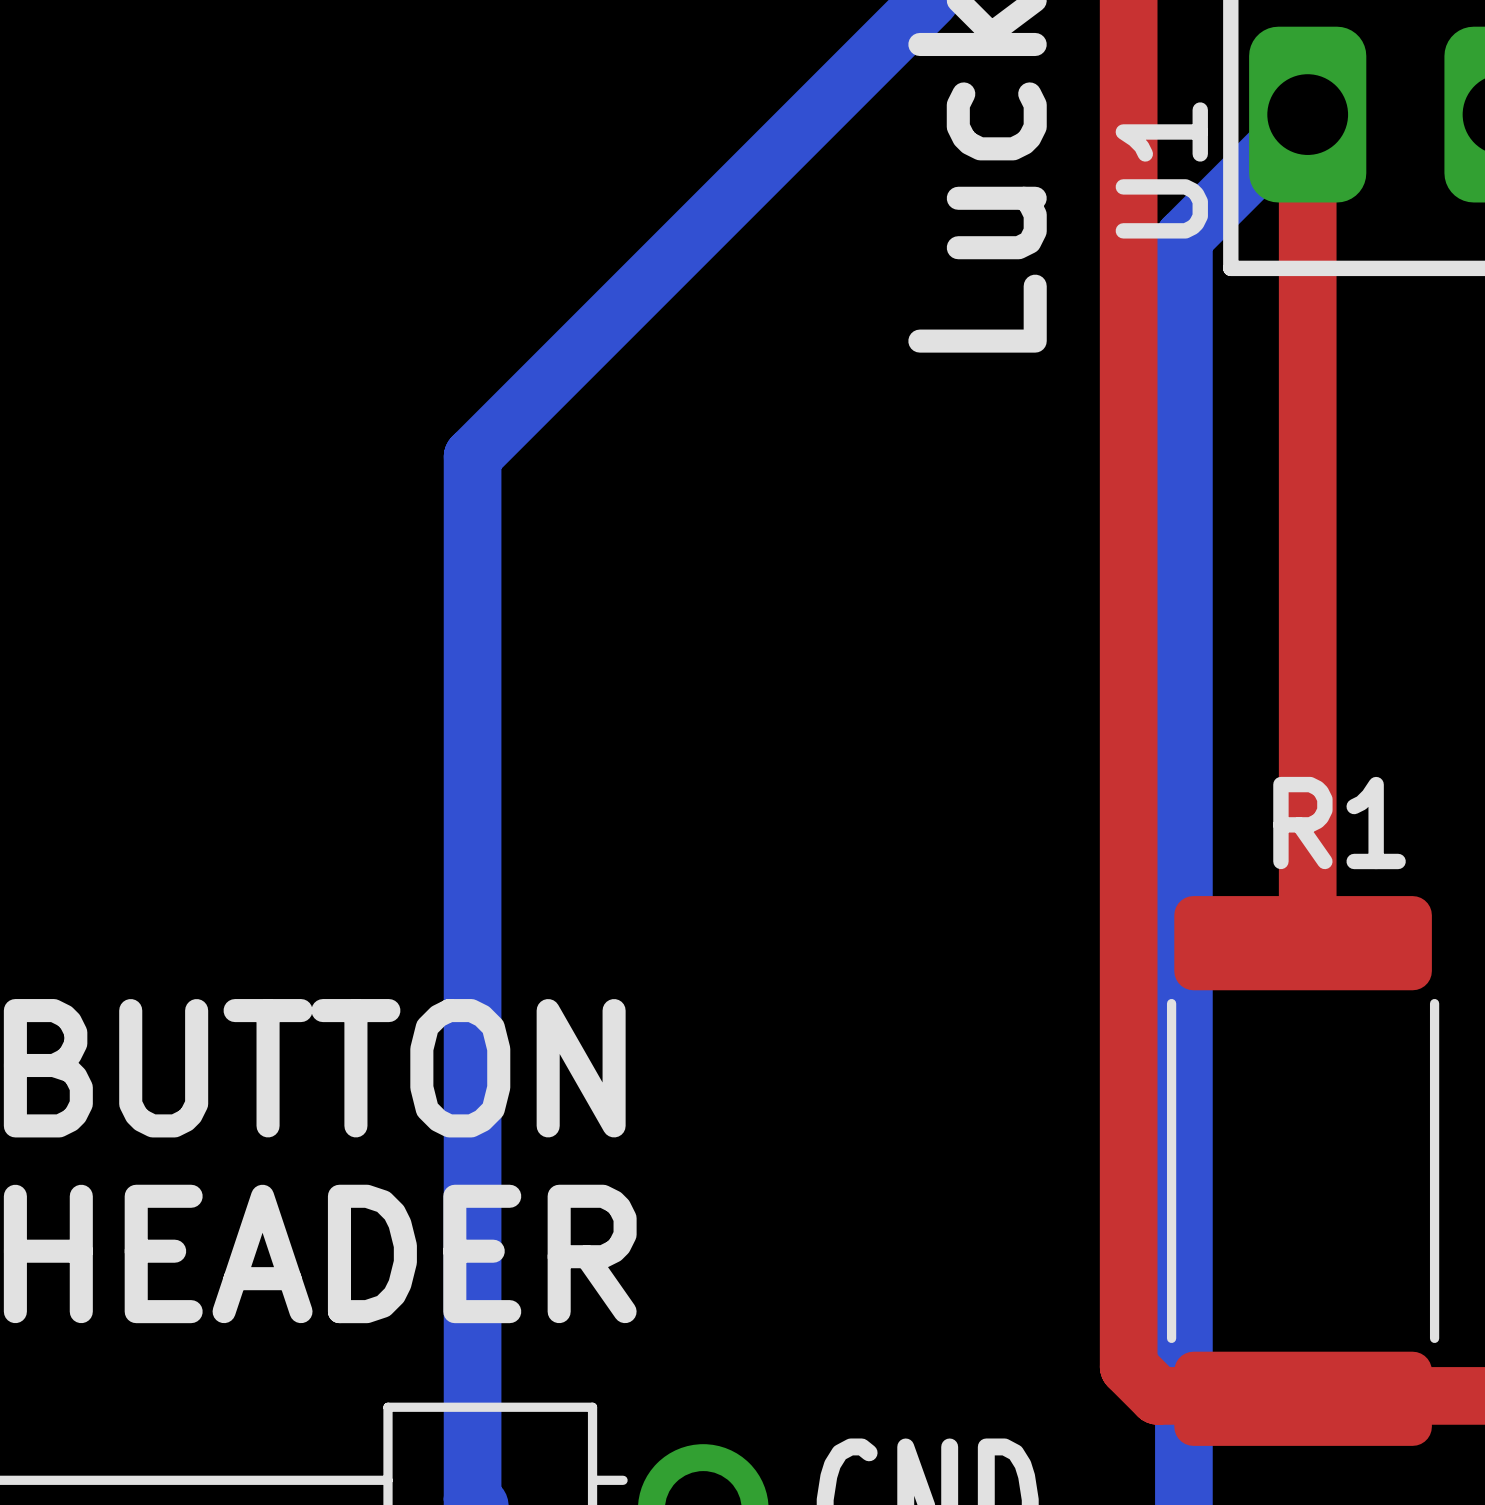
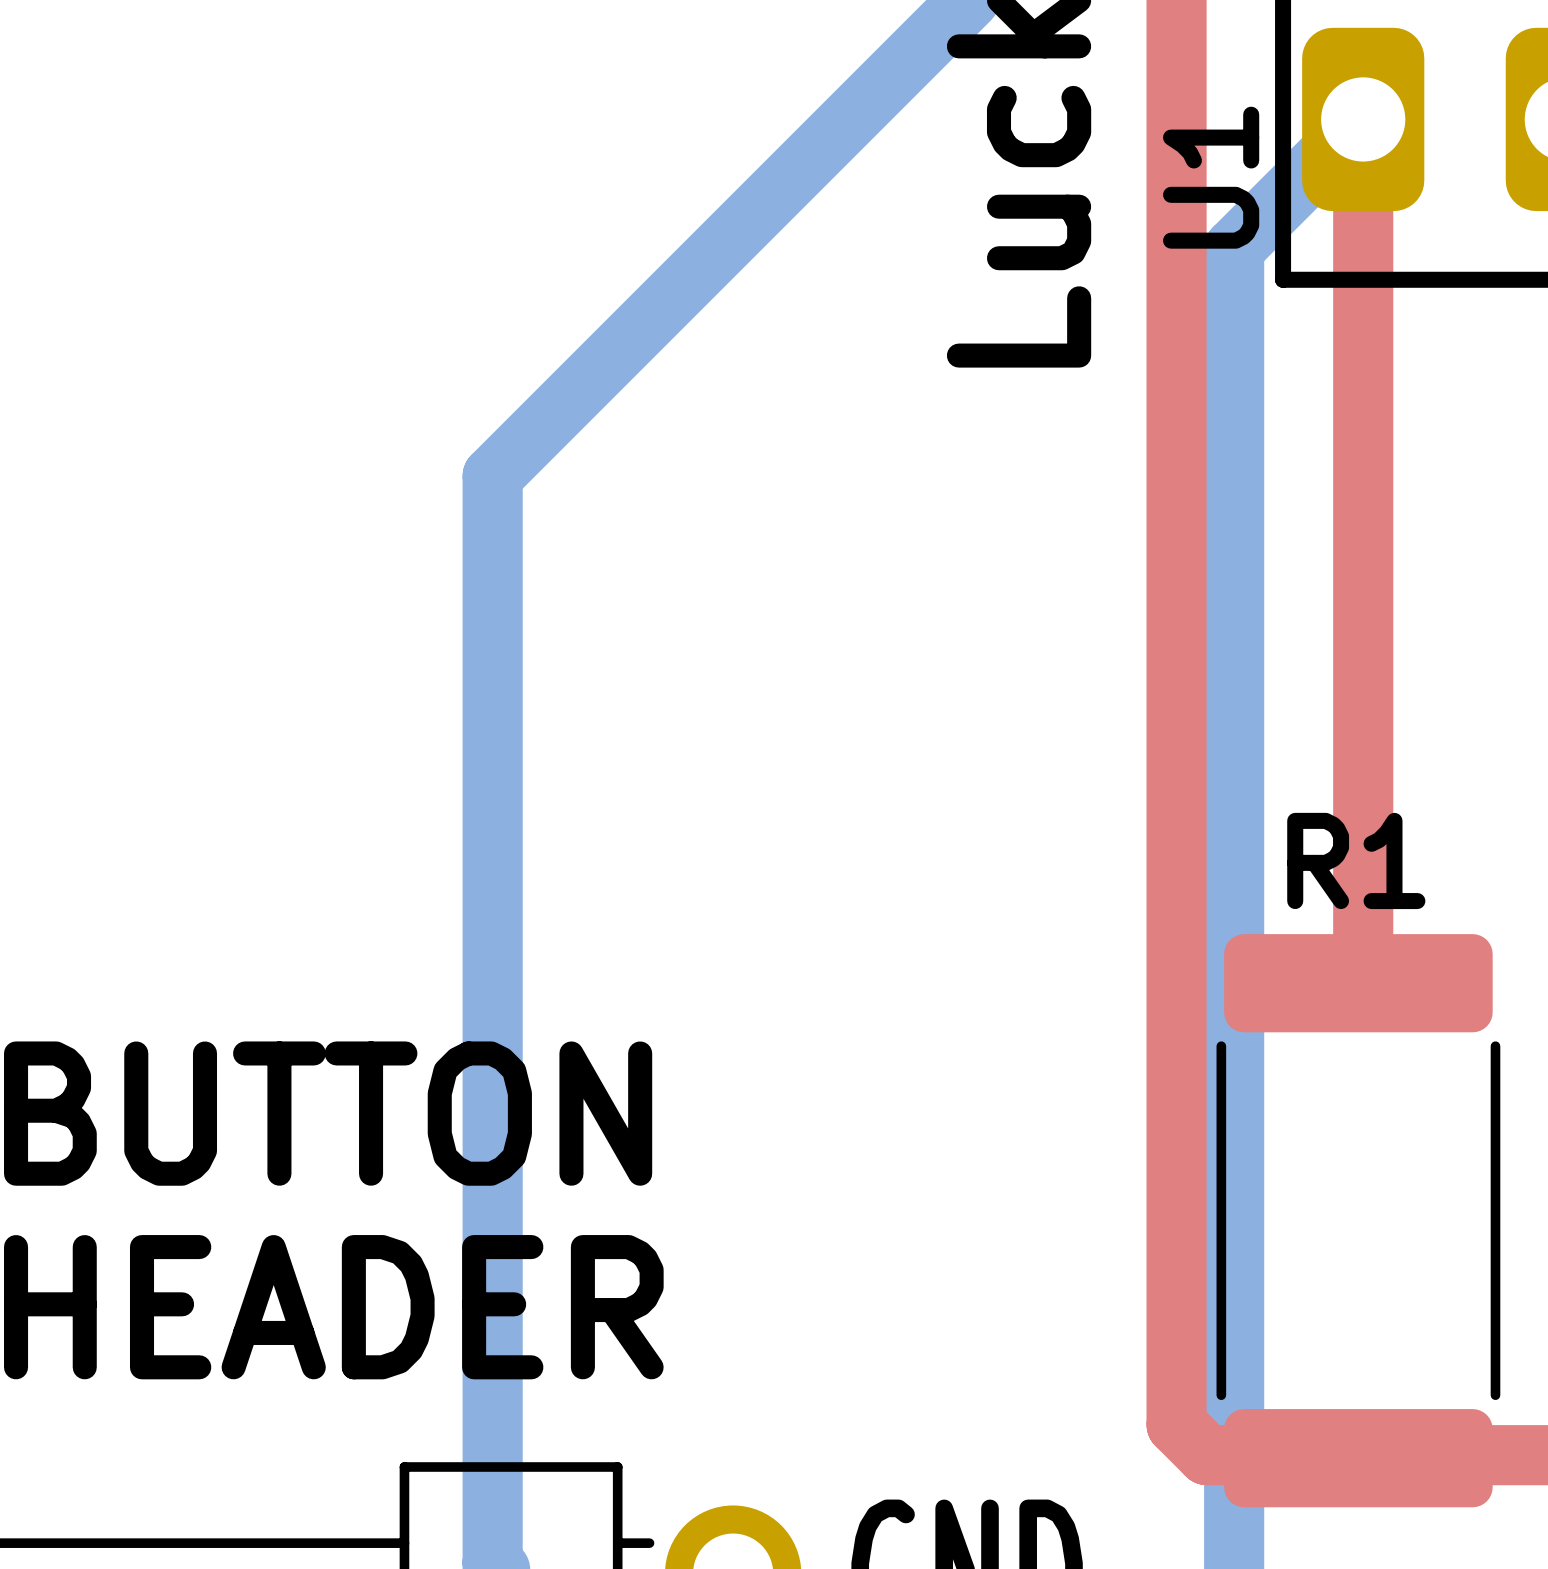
R1 name position: R1 (1339, 823) -> R1 (1356, 860)

